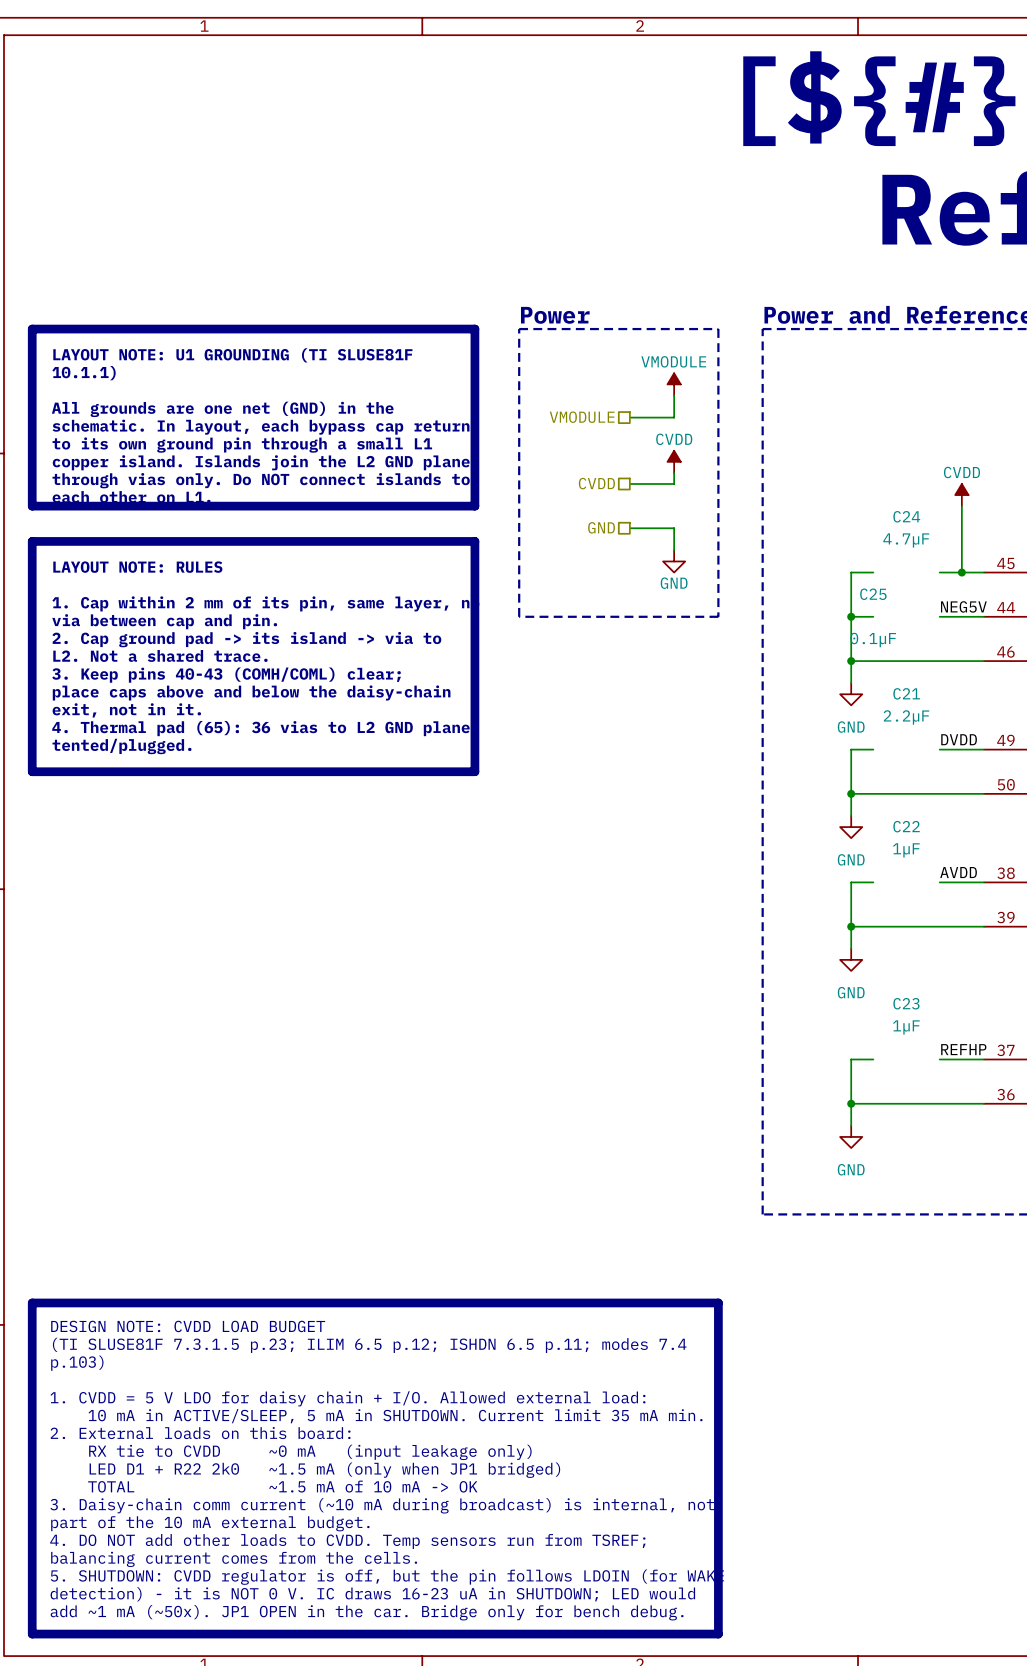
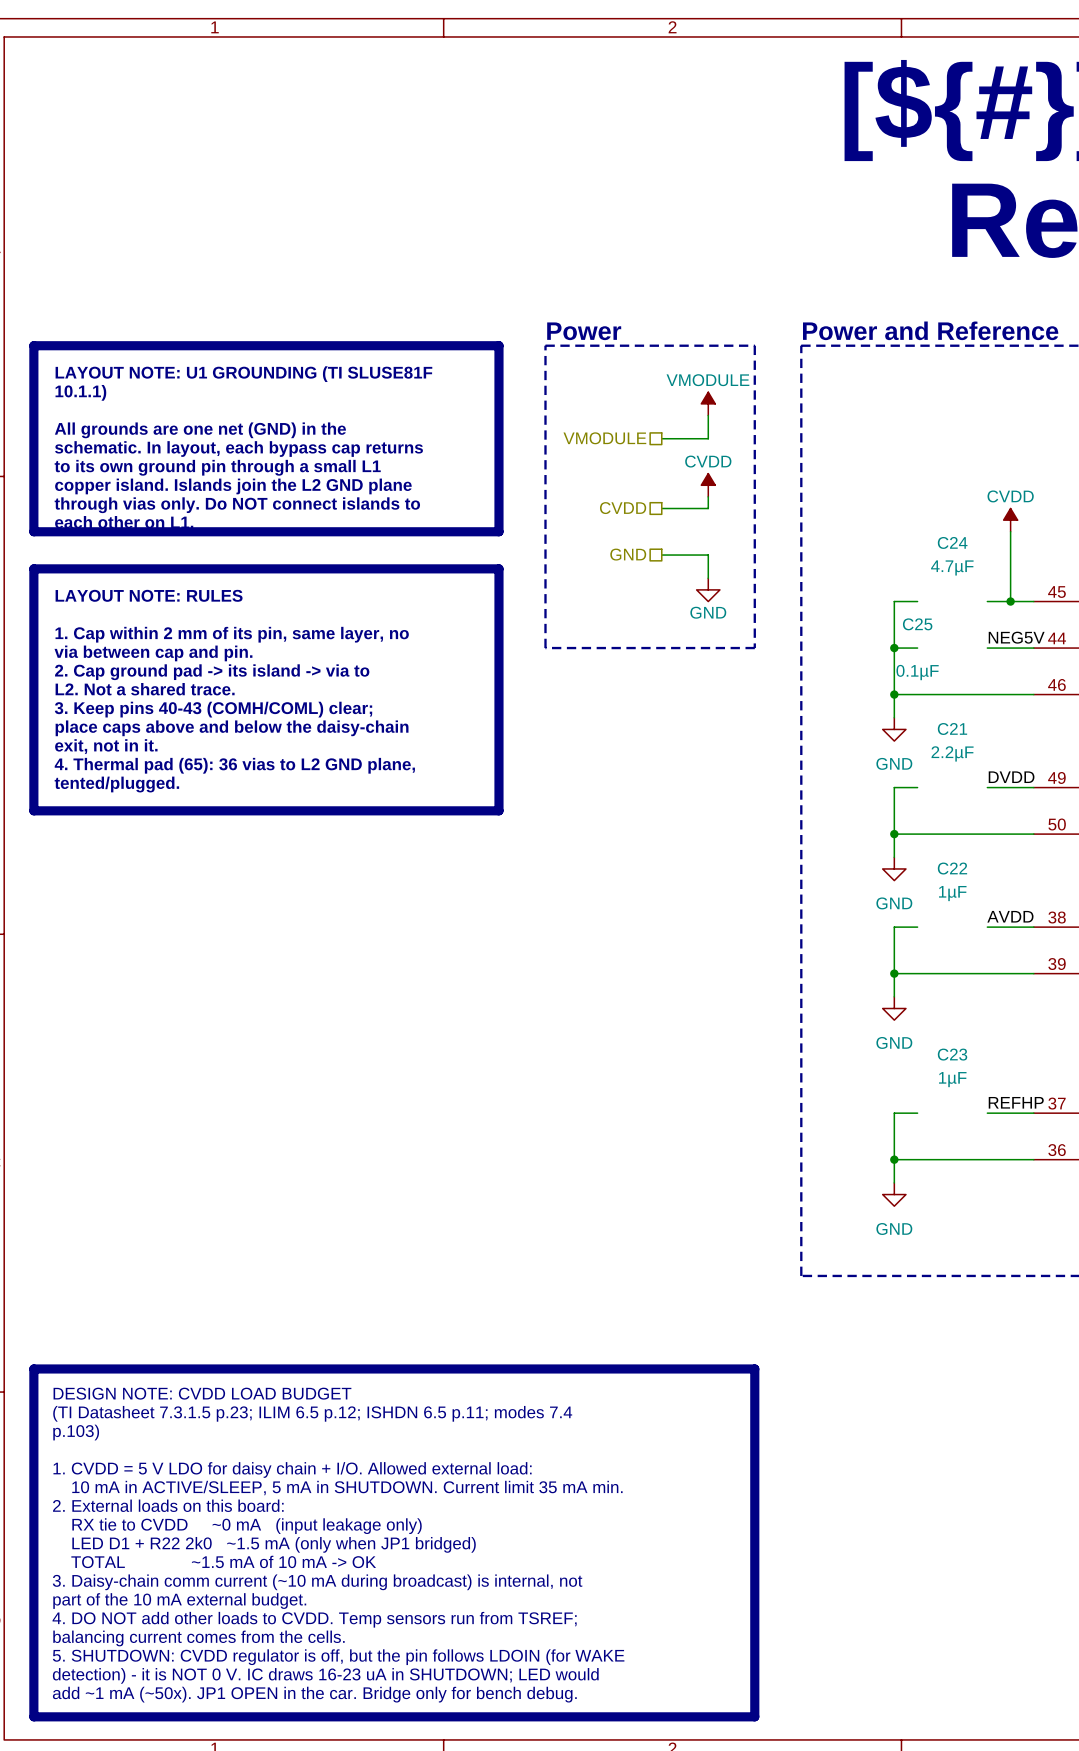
text: (TI SLUSE81F 7.3.1.5 p.23; ILIM 6.5 p.12; ISHDN 6.5 p.11; modes 7.4 (369, 1345) -> (TI Datasheet 7.3.1.5 p.23; ILIM 6.5 p.12; ISHDN 6.5 p.11; modes 7.4 (312, 1413)

